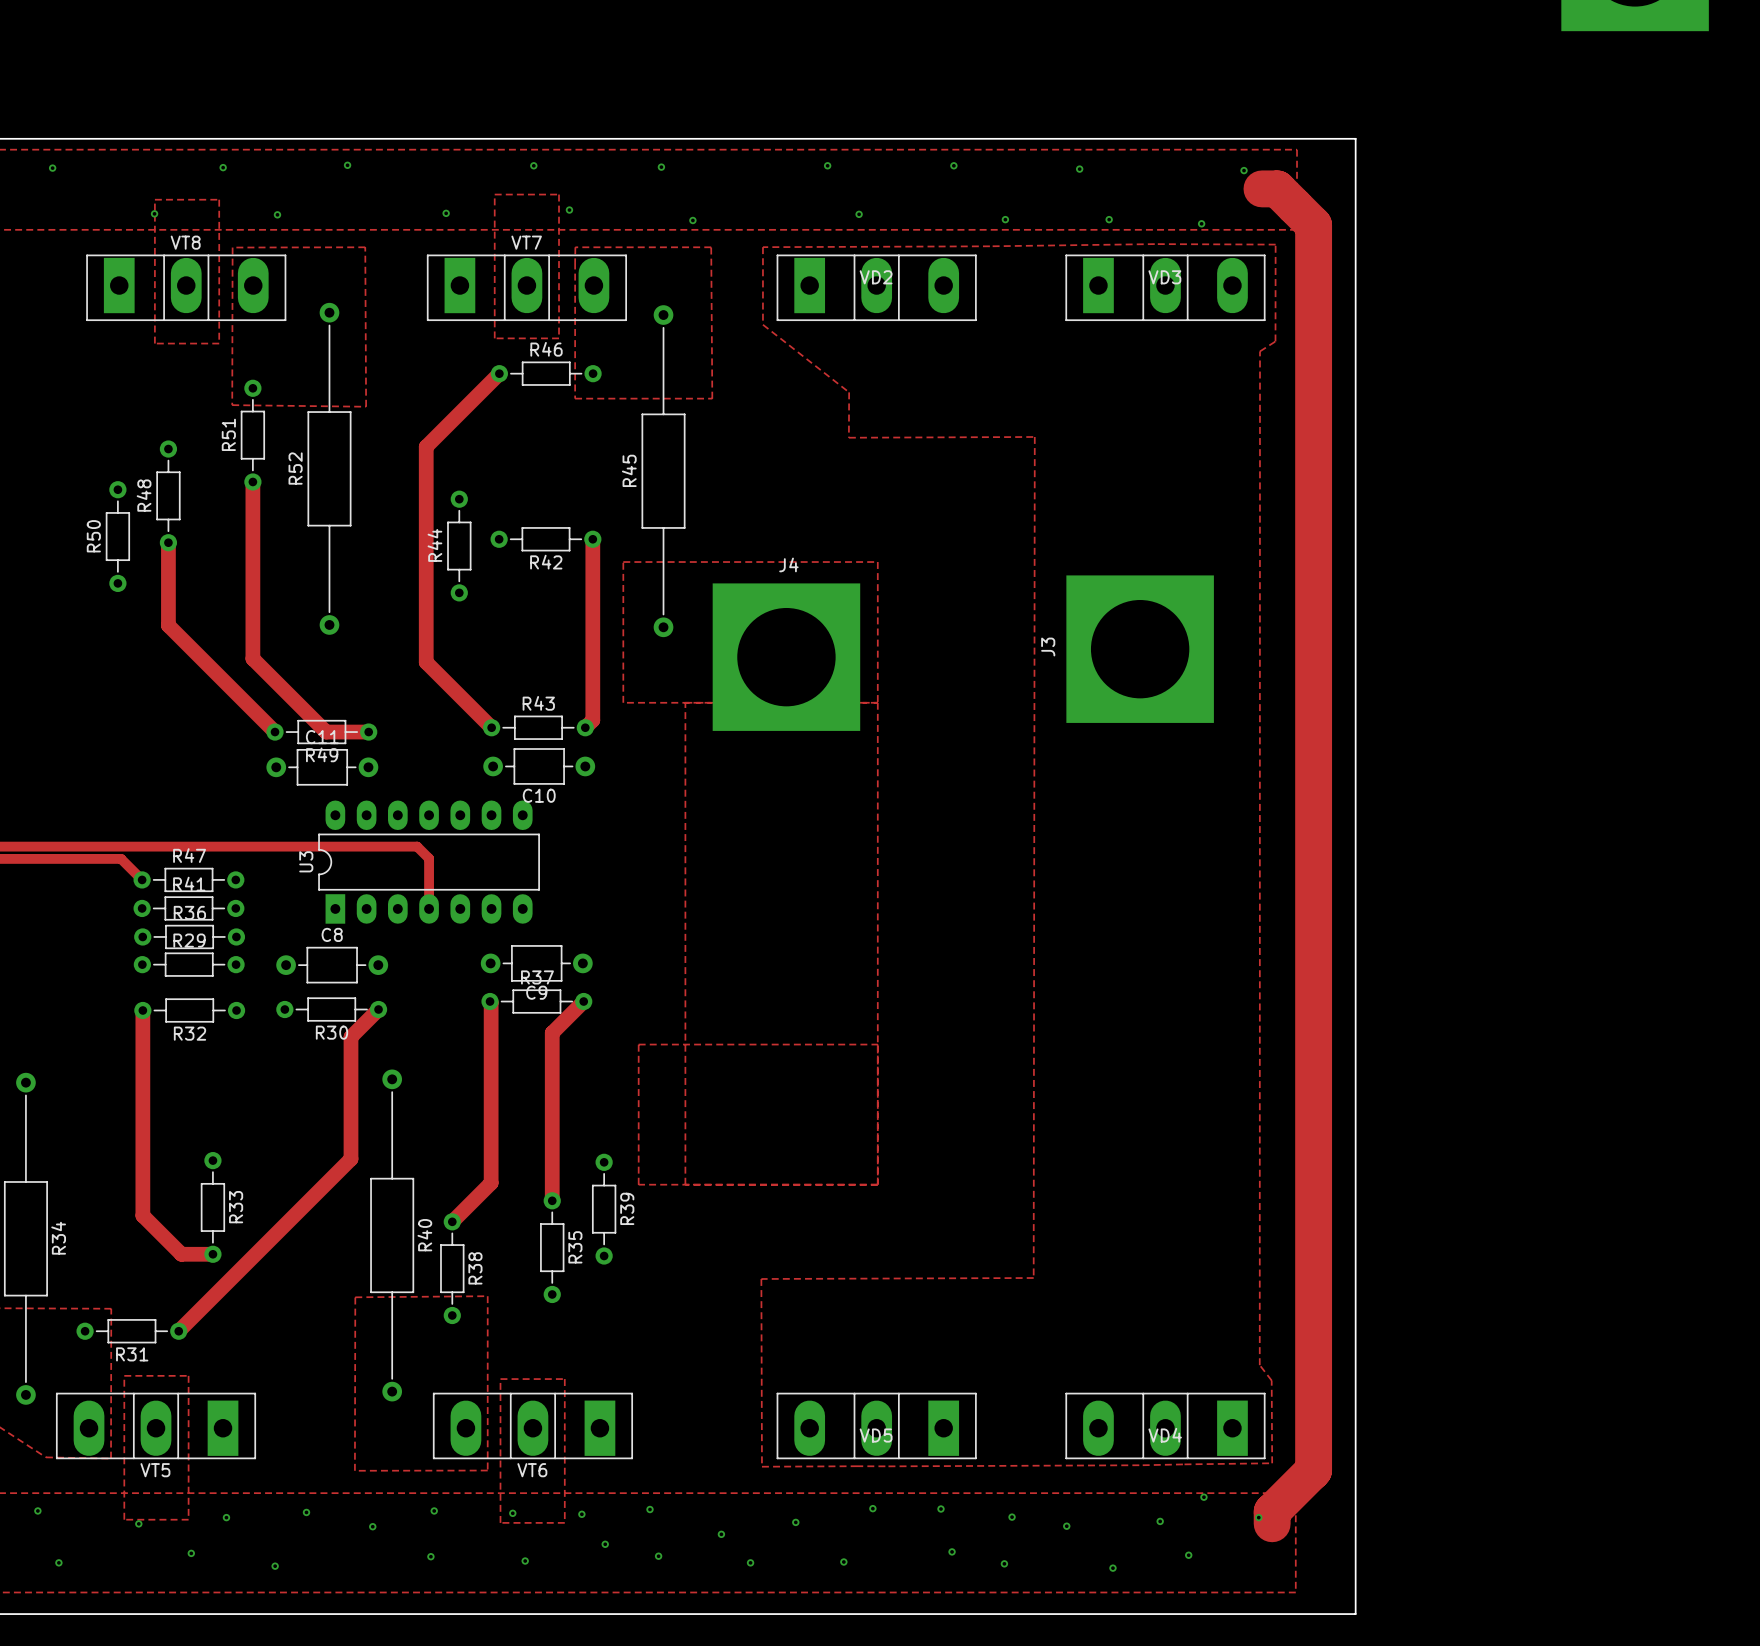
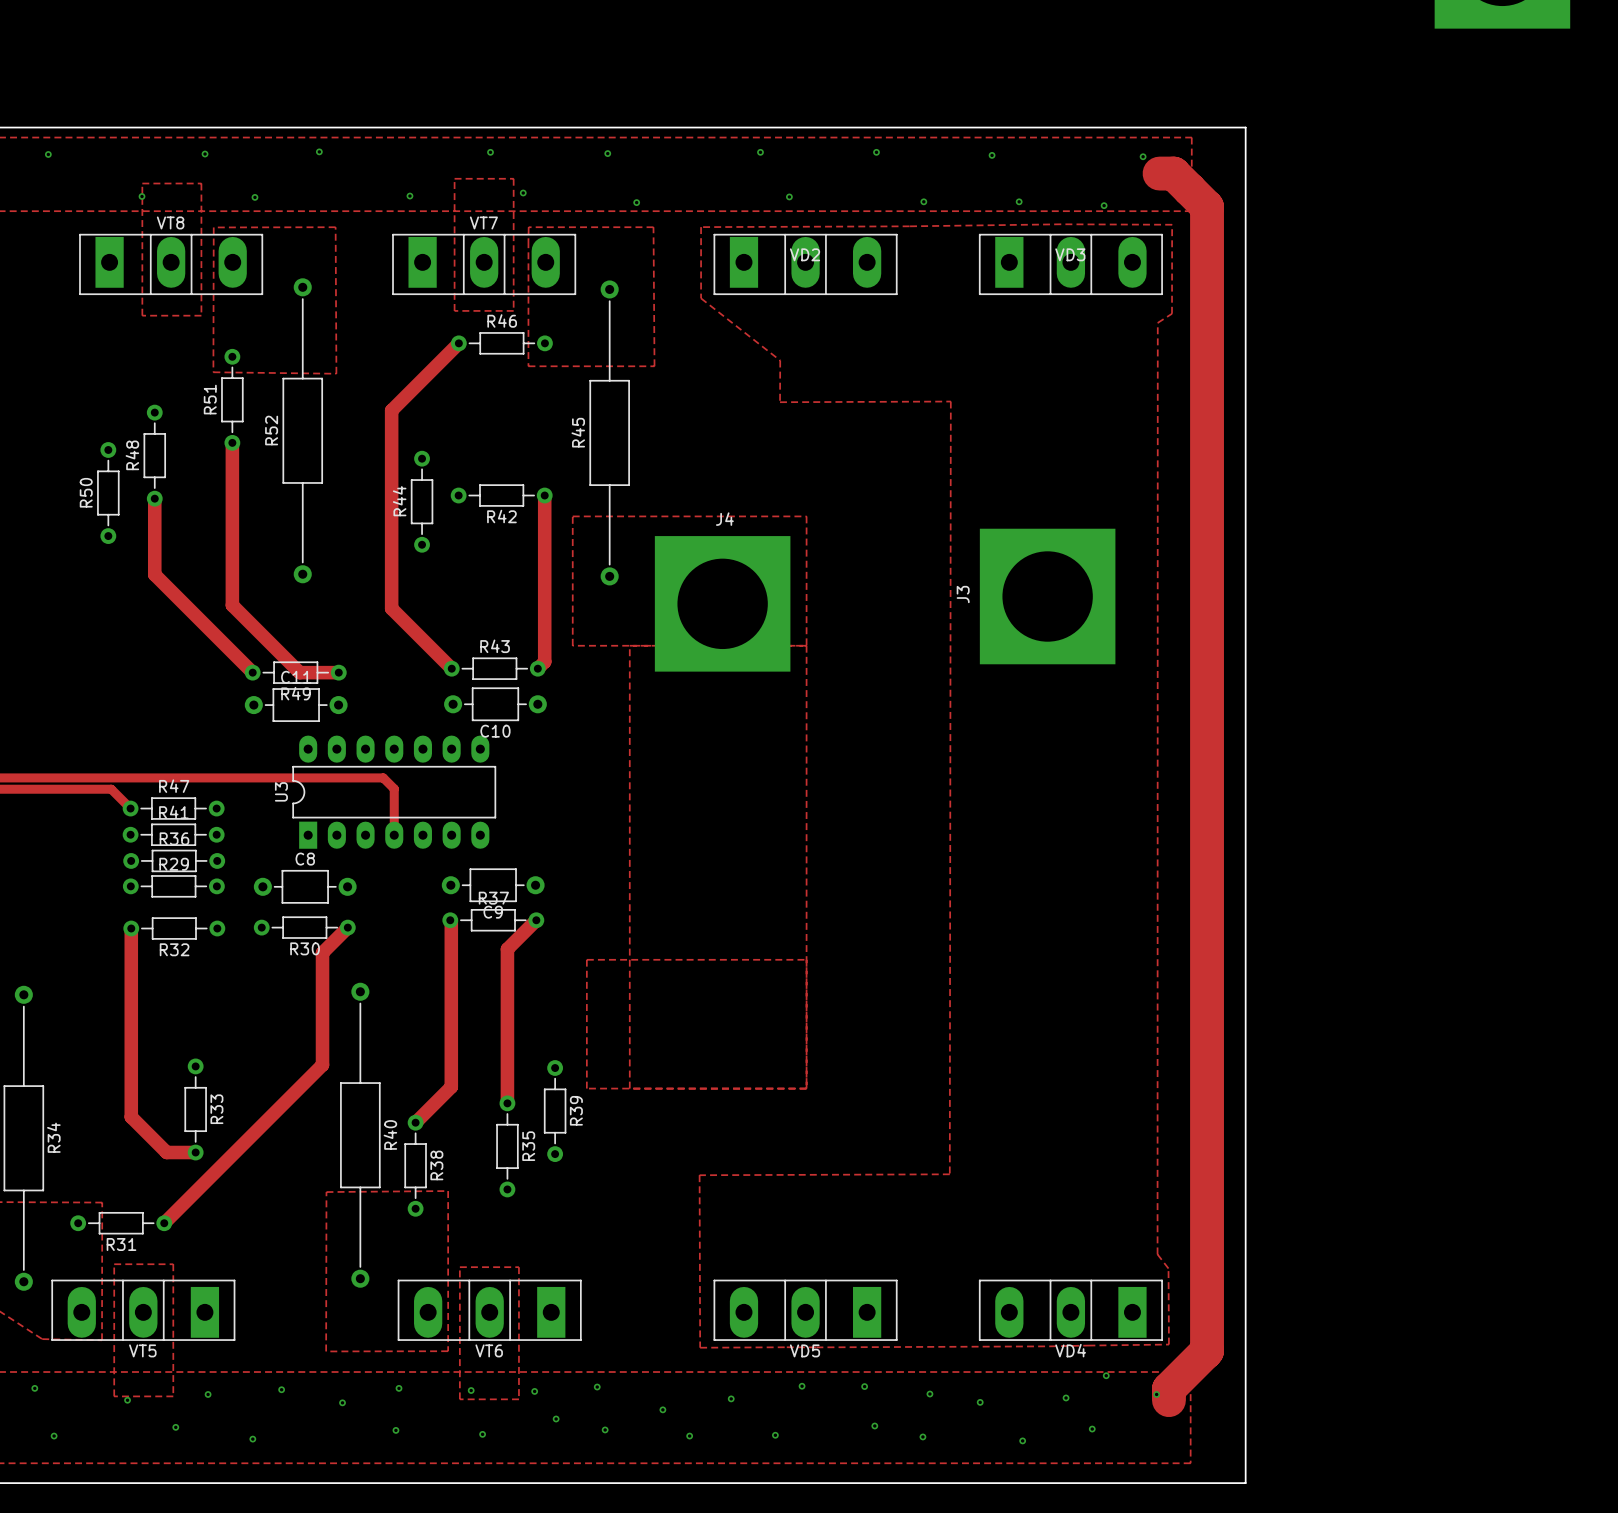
VD5 name position: VD5 (876, 1435) -> VD5 (805, 1350)
VD4 name position: VD4 (1165, 1435) -> VD4 (1070, 1350)

